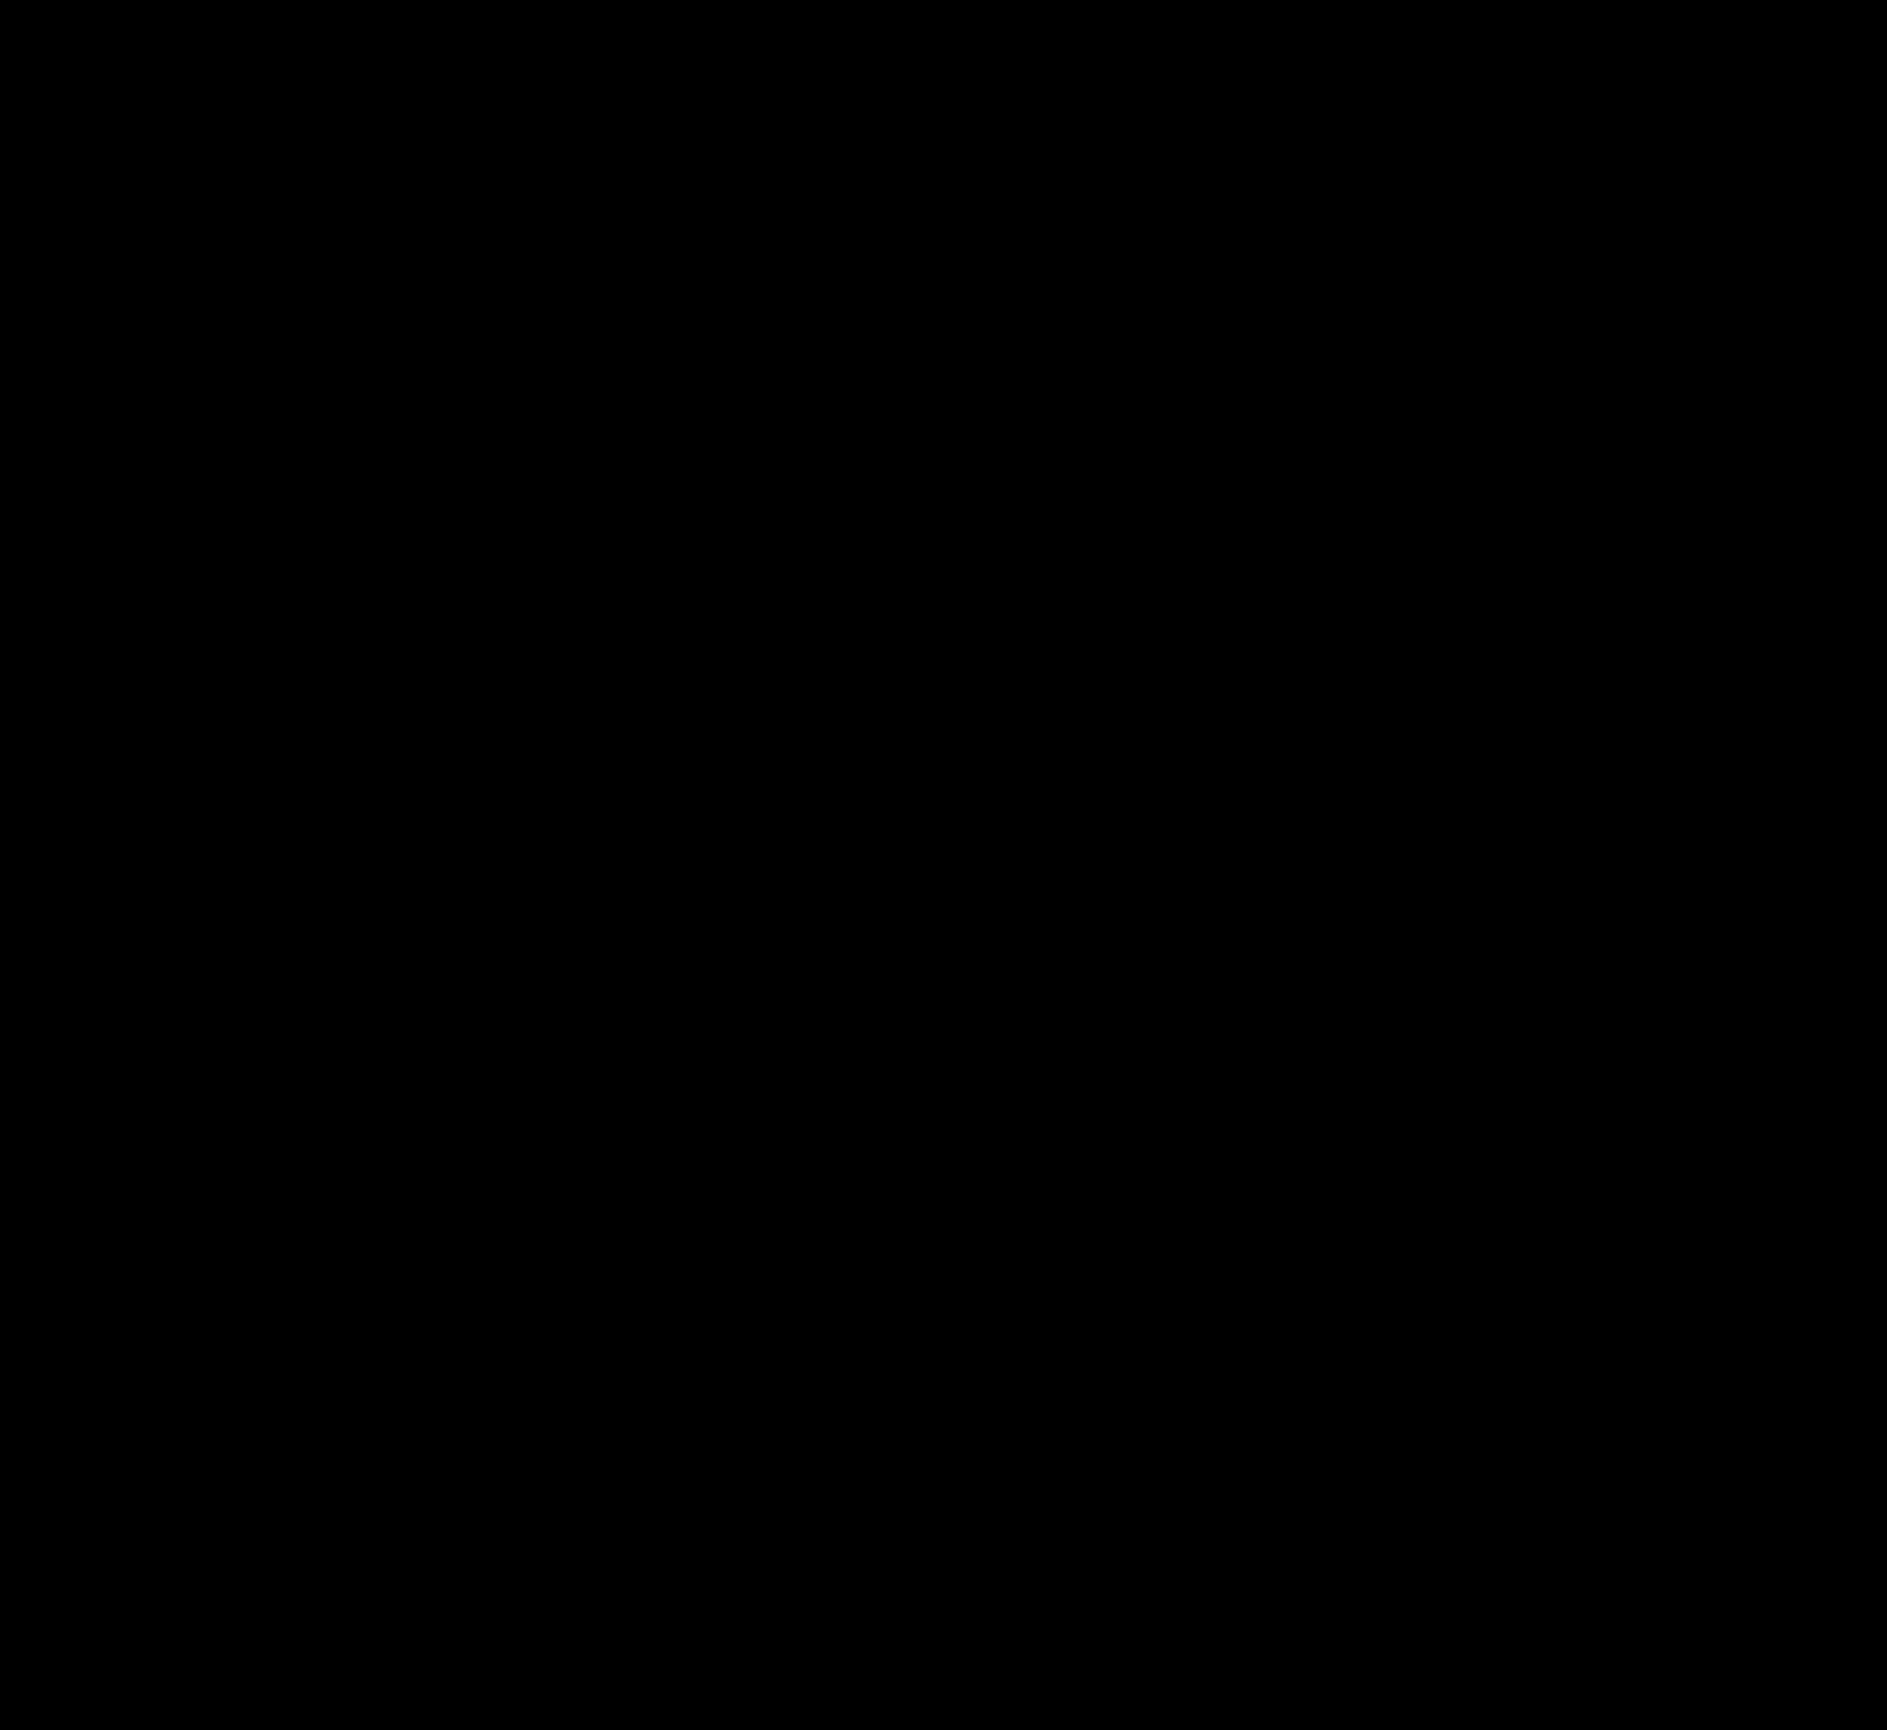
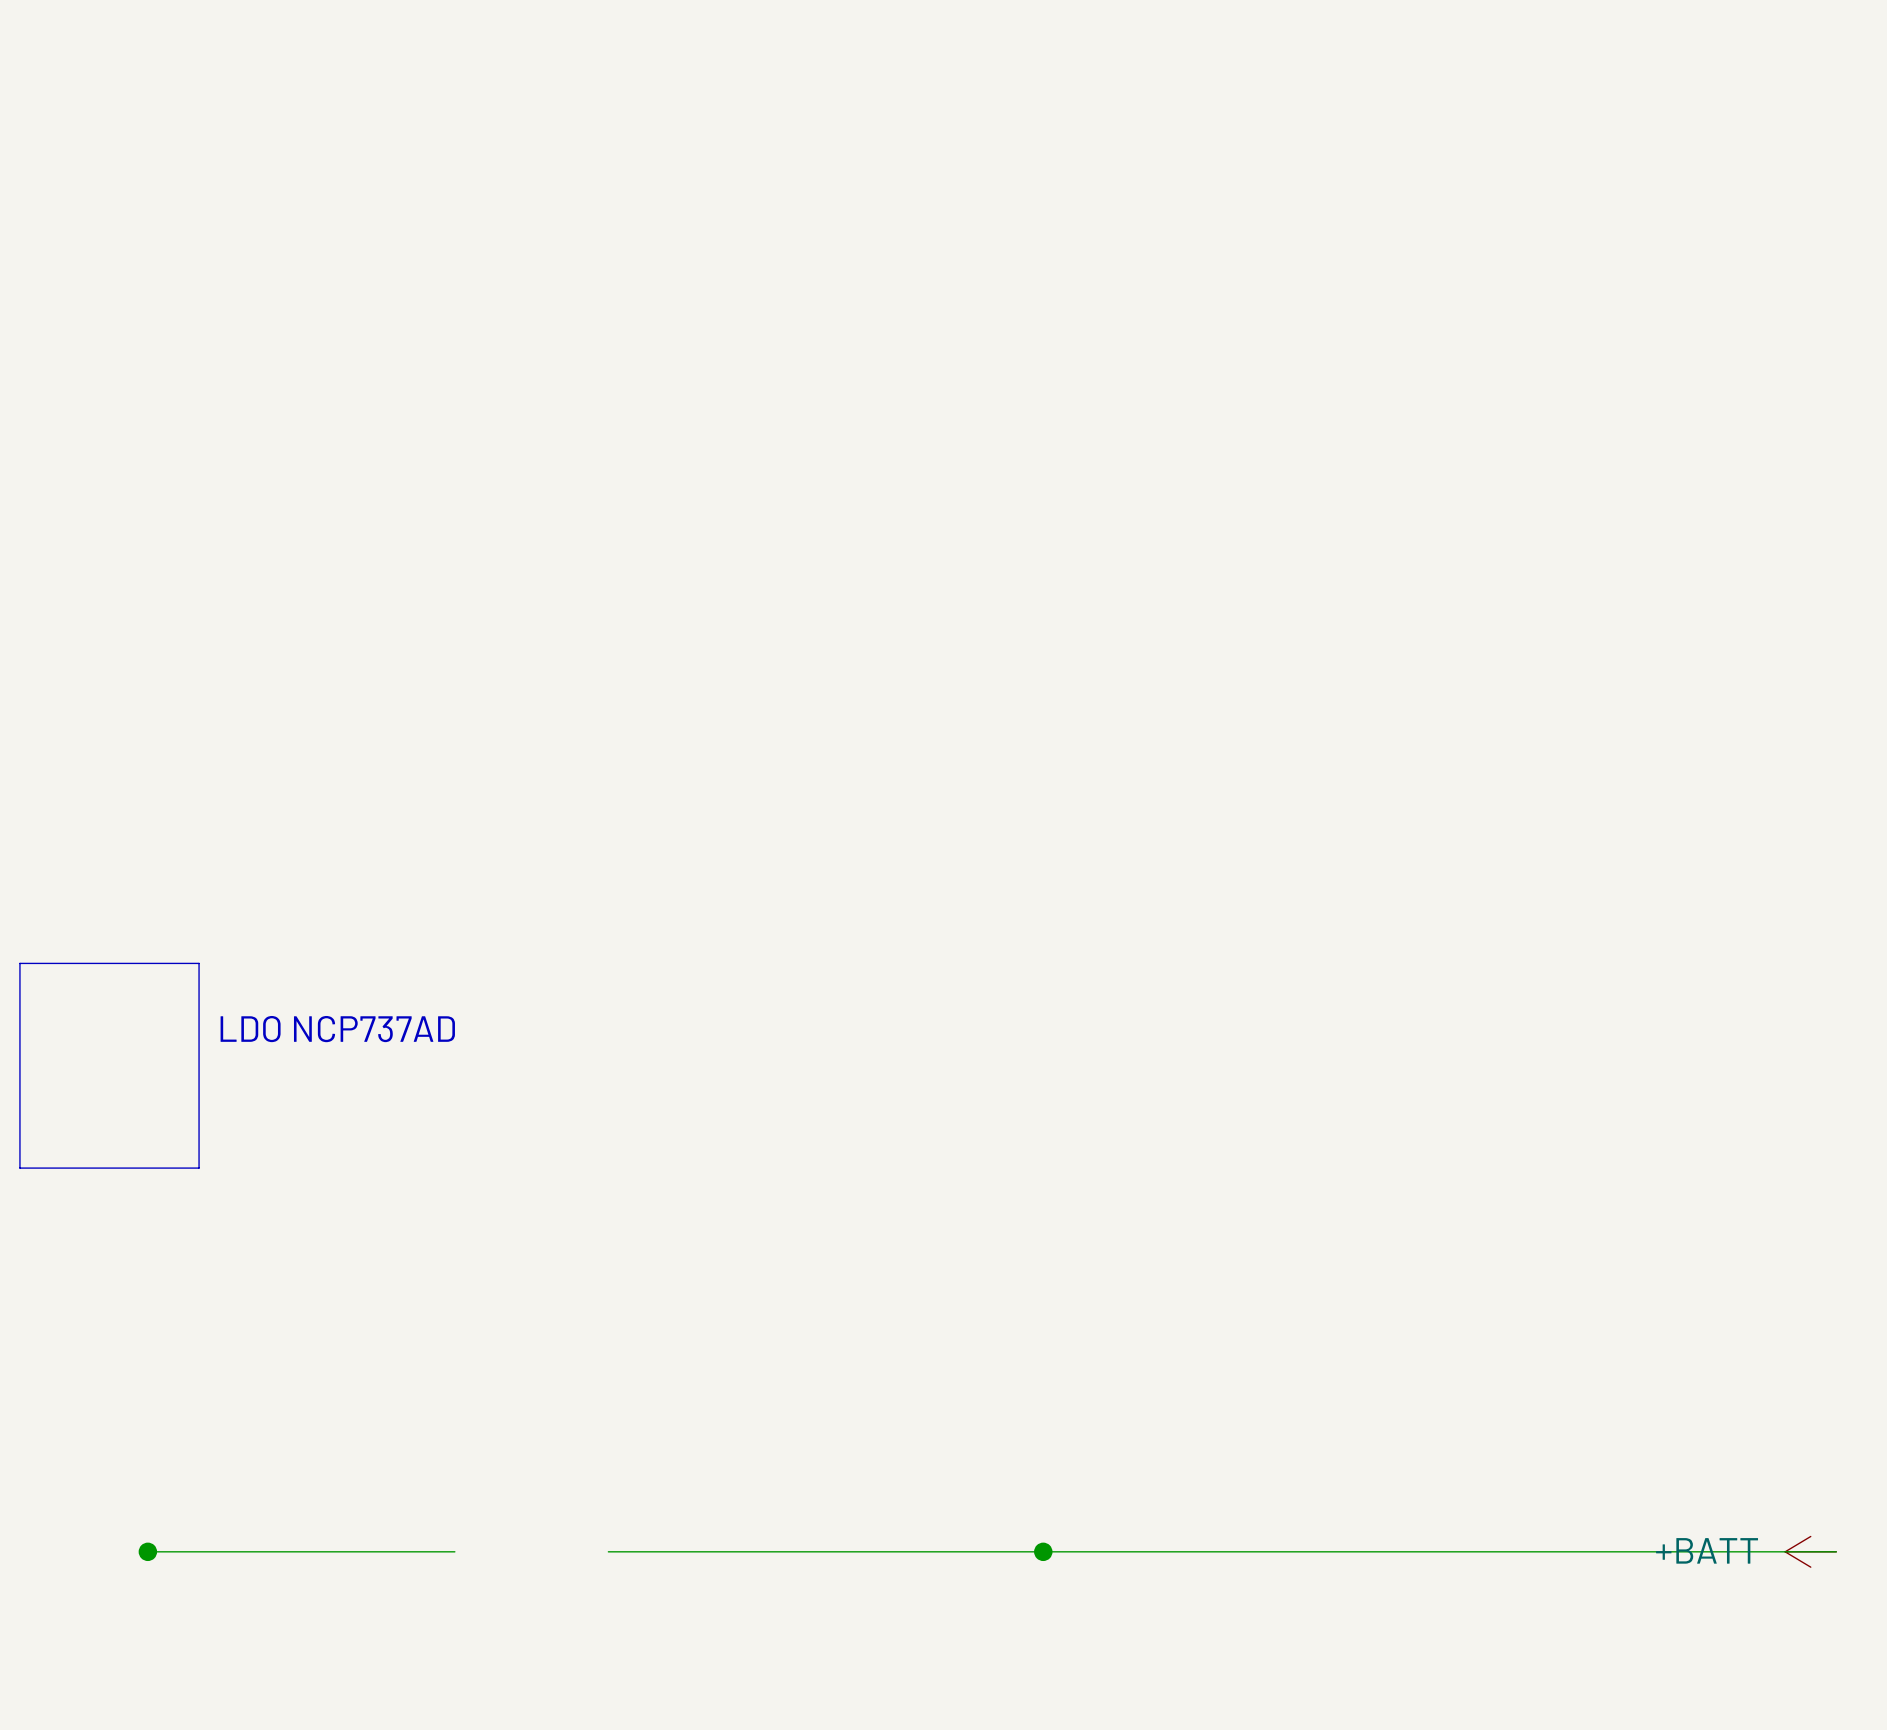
line: none -> (19, 963) (199, 963) (199, 1168) (19, 1168) (19, 963)
text: none -> LDO NCP737AD (337, 1029)
wire: none -> (147, 1551) (454, 1551)
junction: none -> (147, 1551)
wire: none -> (608, 1551) (1836, 1551)
junction: none -> (1043, 1551)
power symbol: none -> +BATT (1810, 1551)

